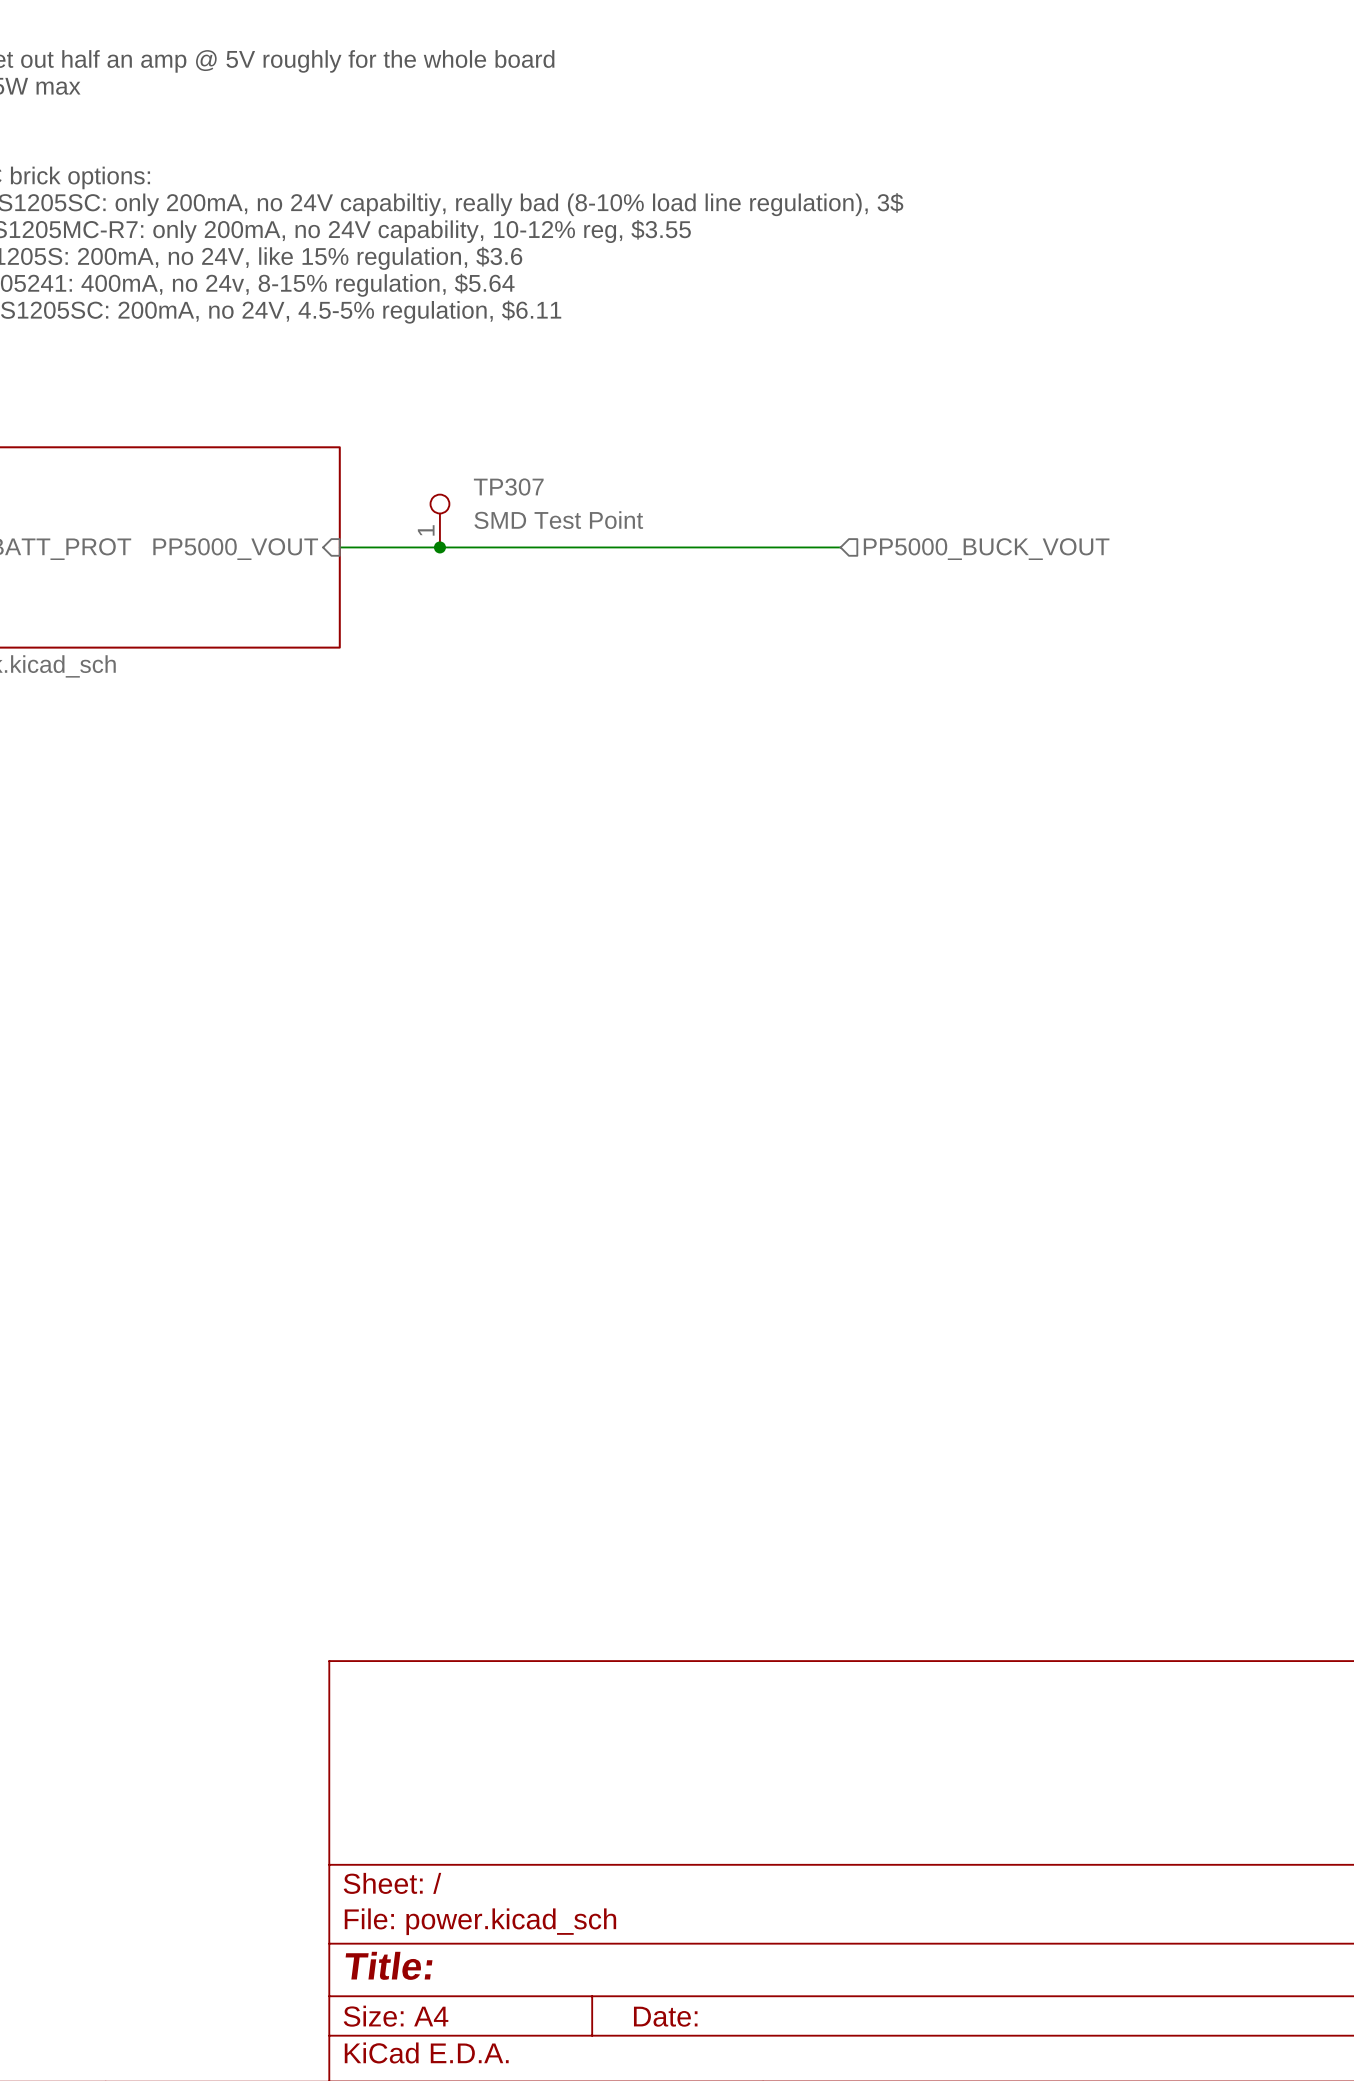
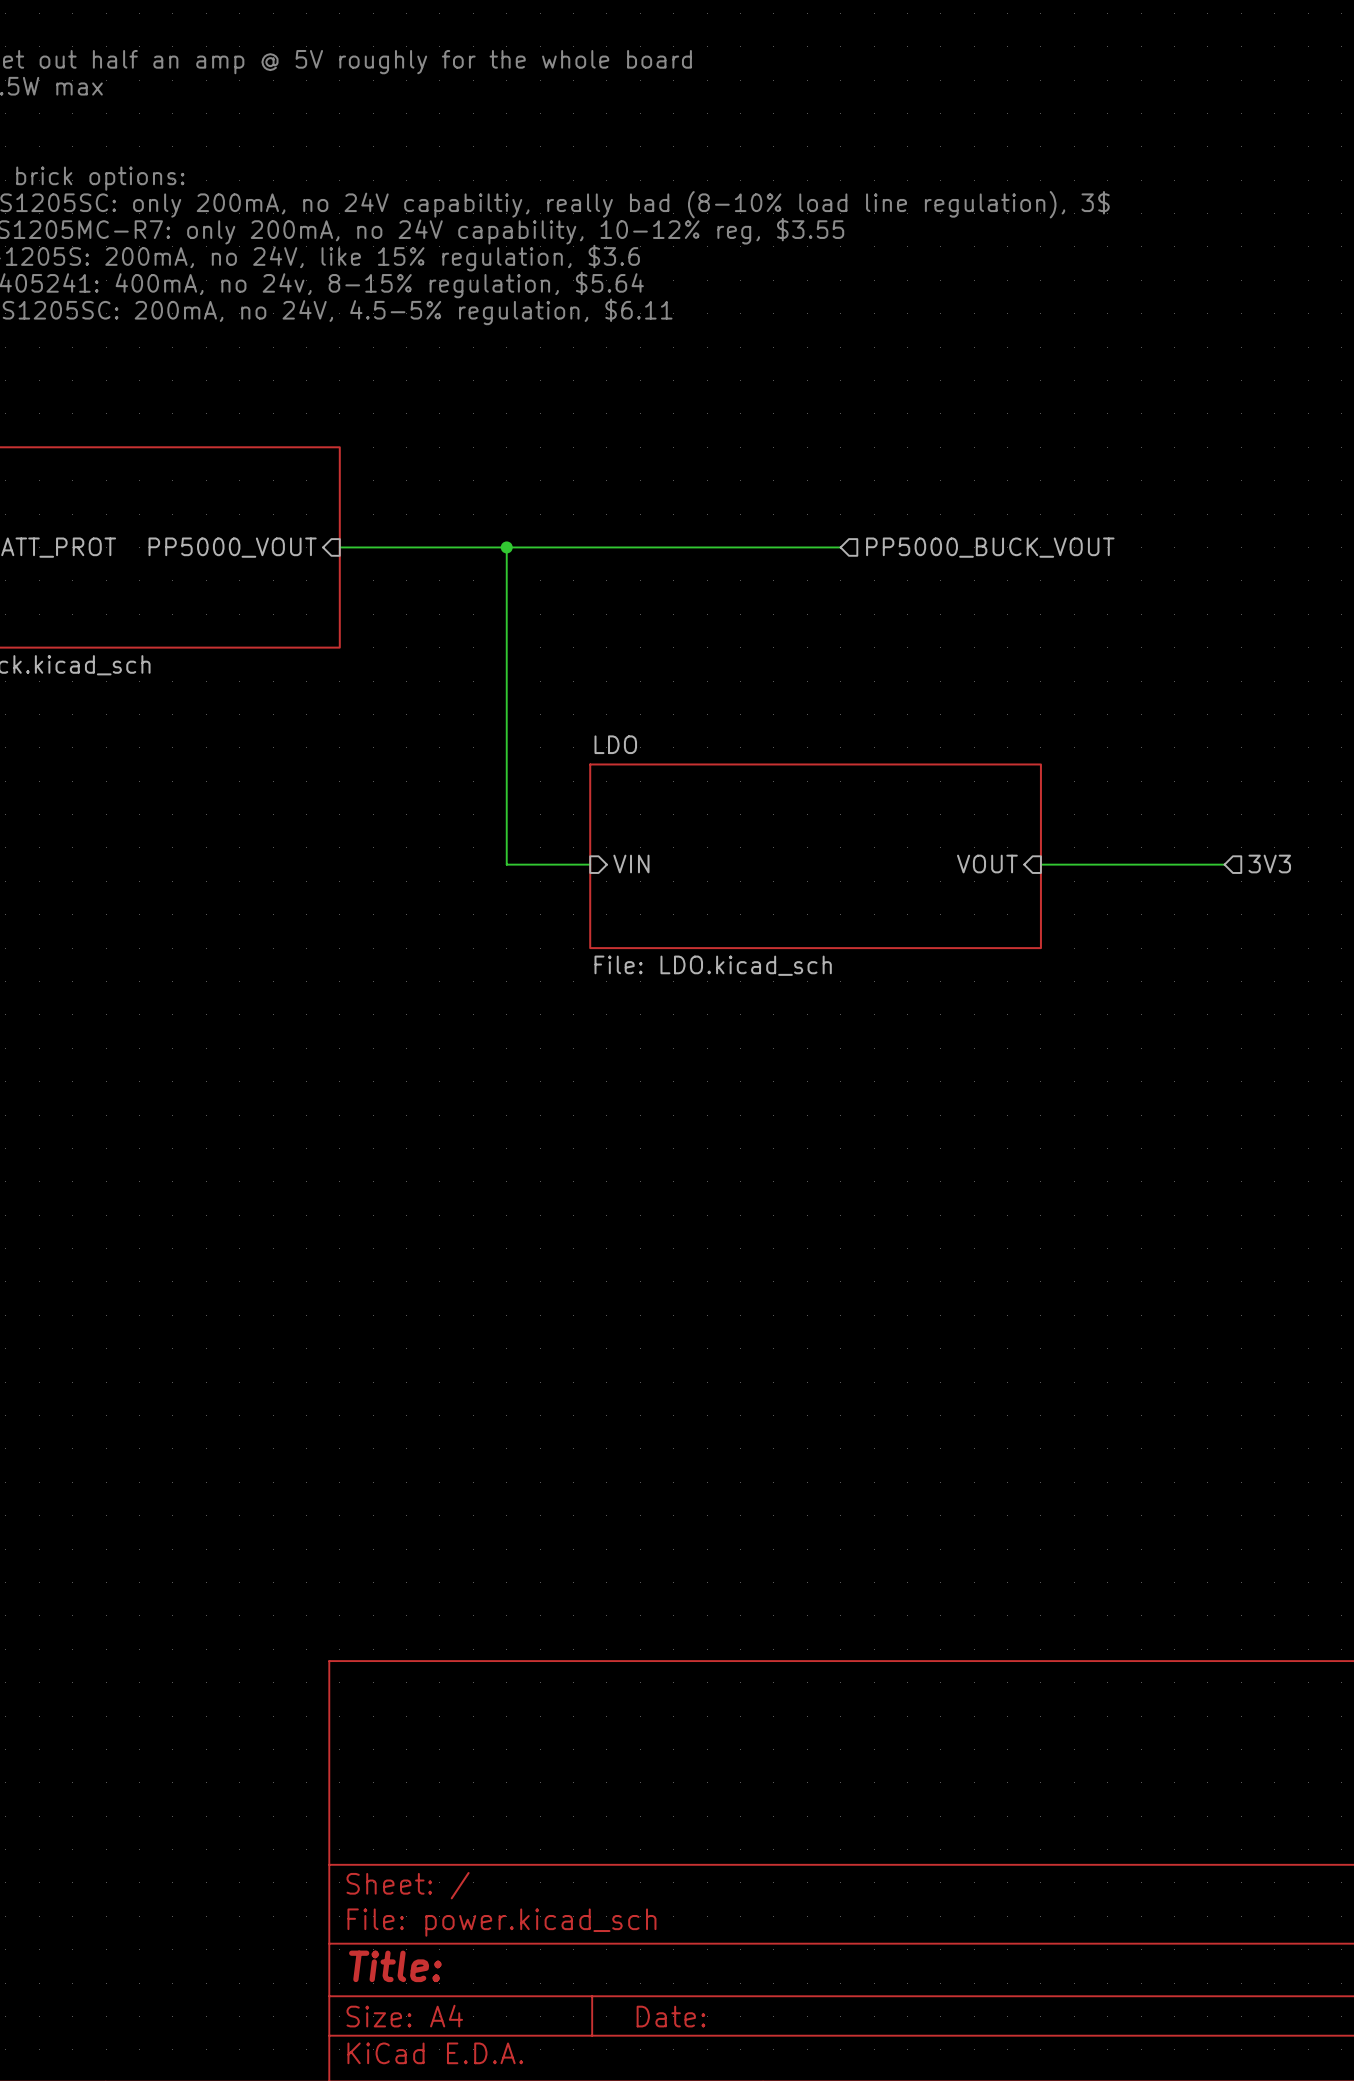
TP307: SMD Test Point (439, 521) -> none
junction position: (439, 547) -> (506, 547)
wire: none -> (506, 547) (506, 864) (590, 864)
sheet LDO: none -> File: LDO.kicad_sch (815, 856)
sheet pin: none -> VIN (631, 864)
sheet pin: none -> VOUT (987, 864)
wire: none -> (1040, 864) (1224, 864)
hierarchical label: none -> 3V3 (1269, 864)

